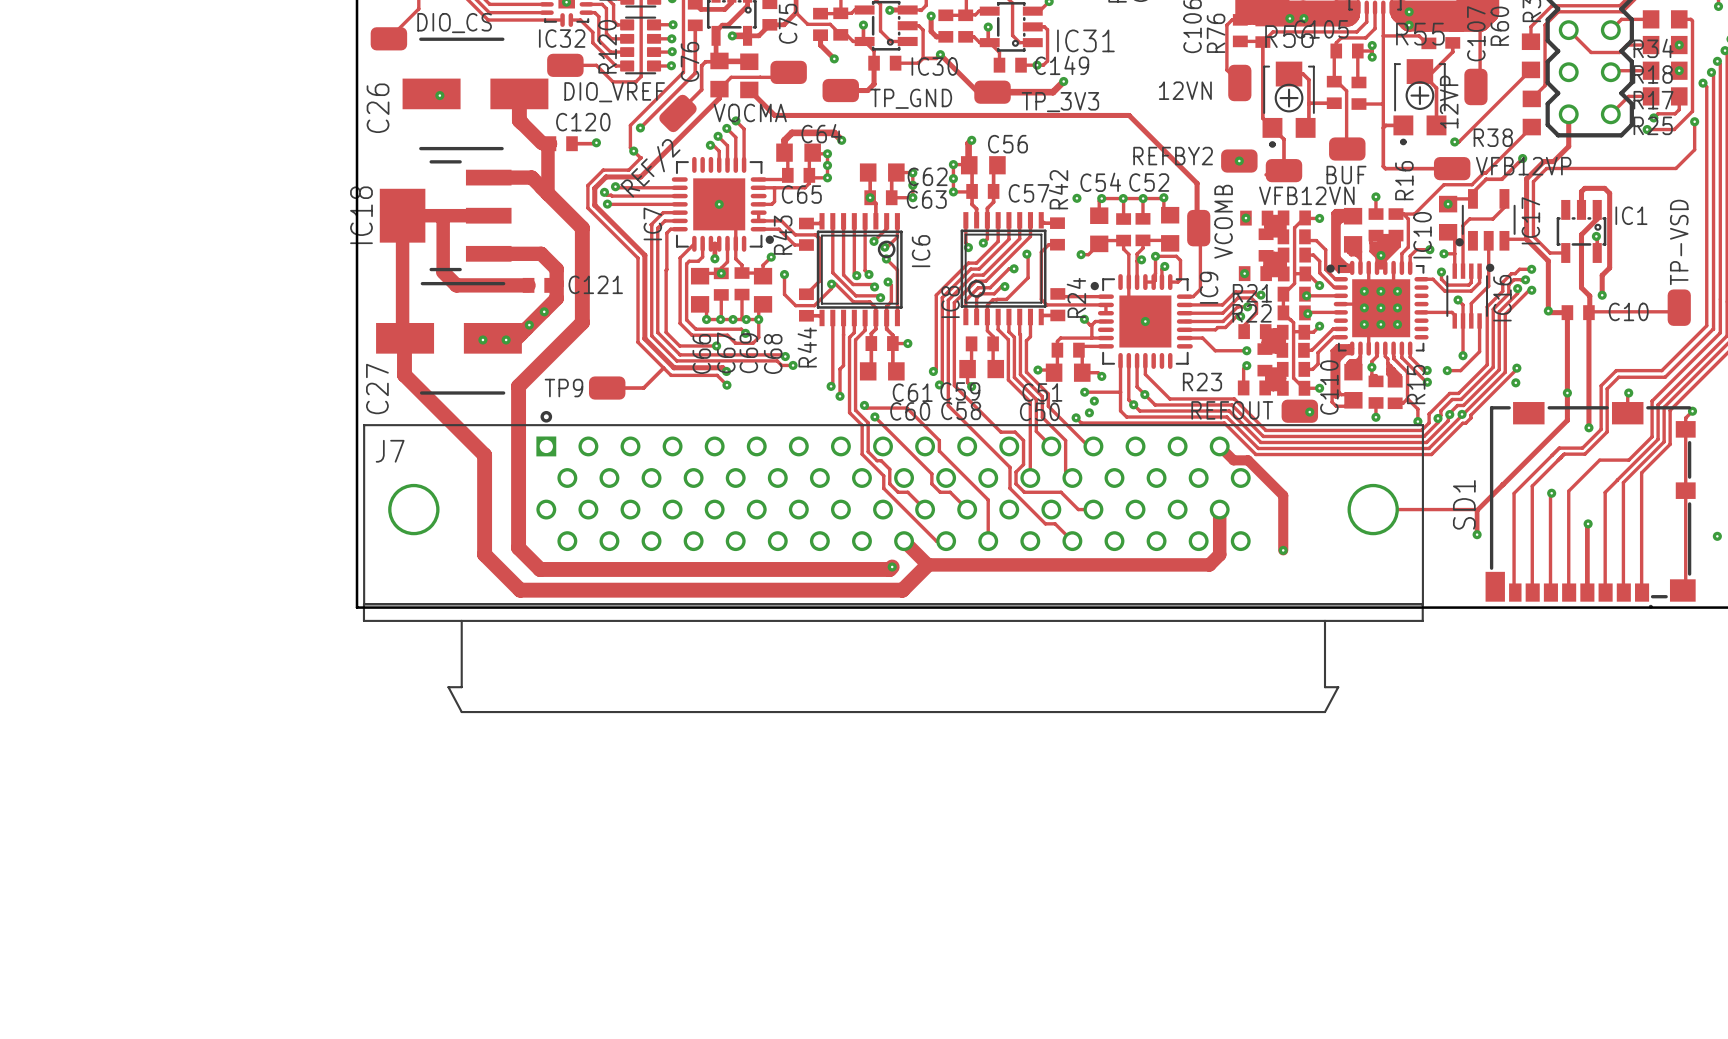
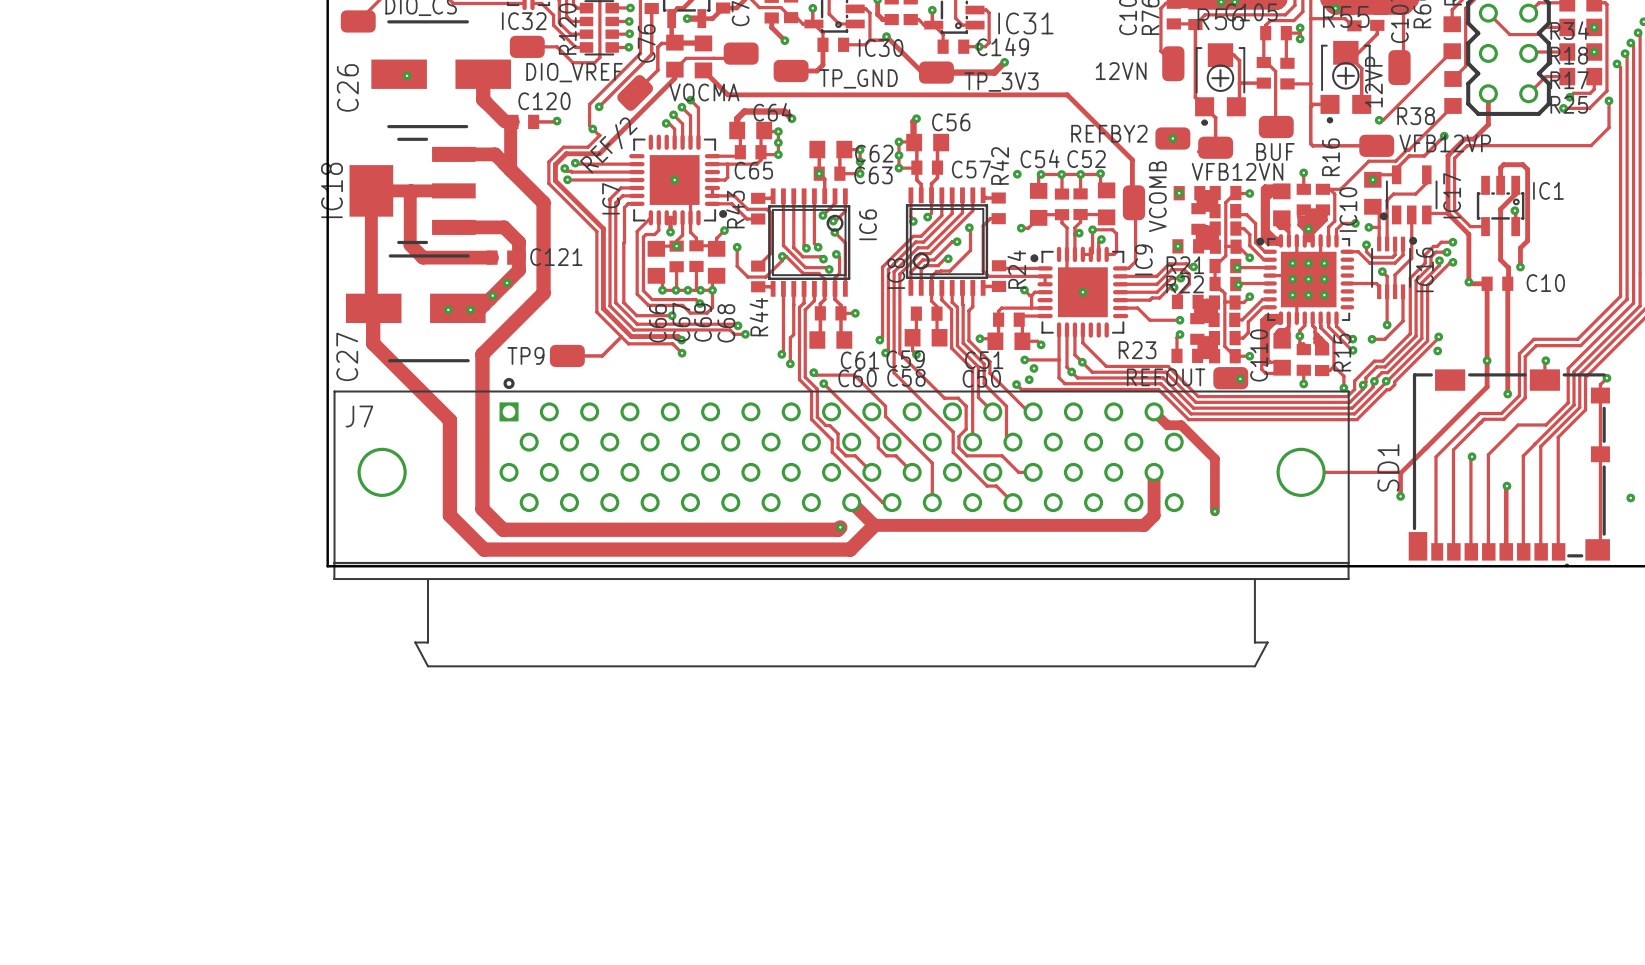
track: (1679, 307) (1675, 311) (1589, 311) -> none
TP-VSD: (1679, 307) -> none

